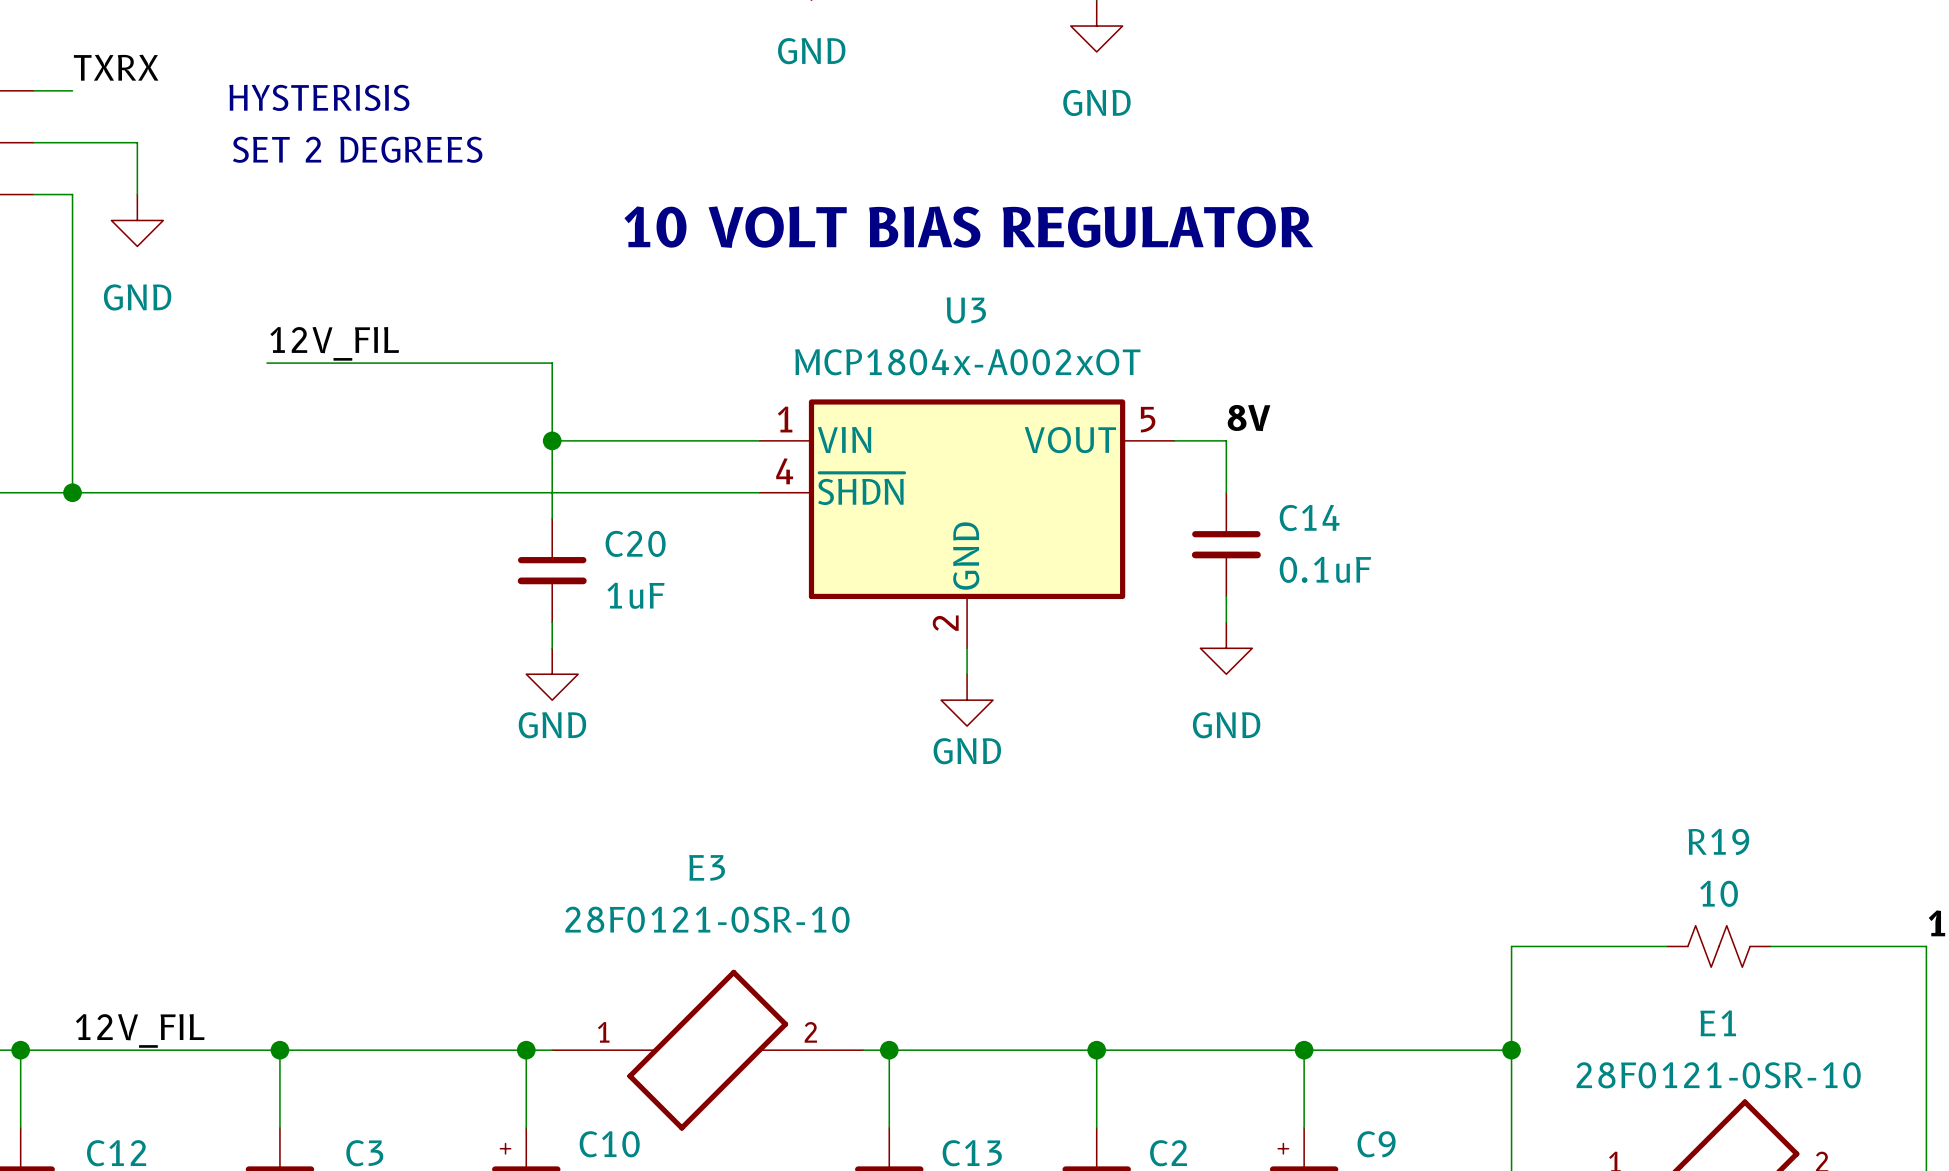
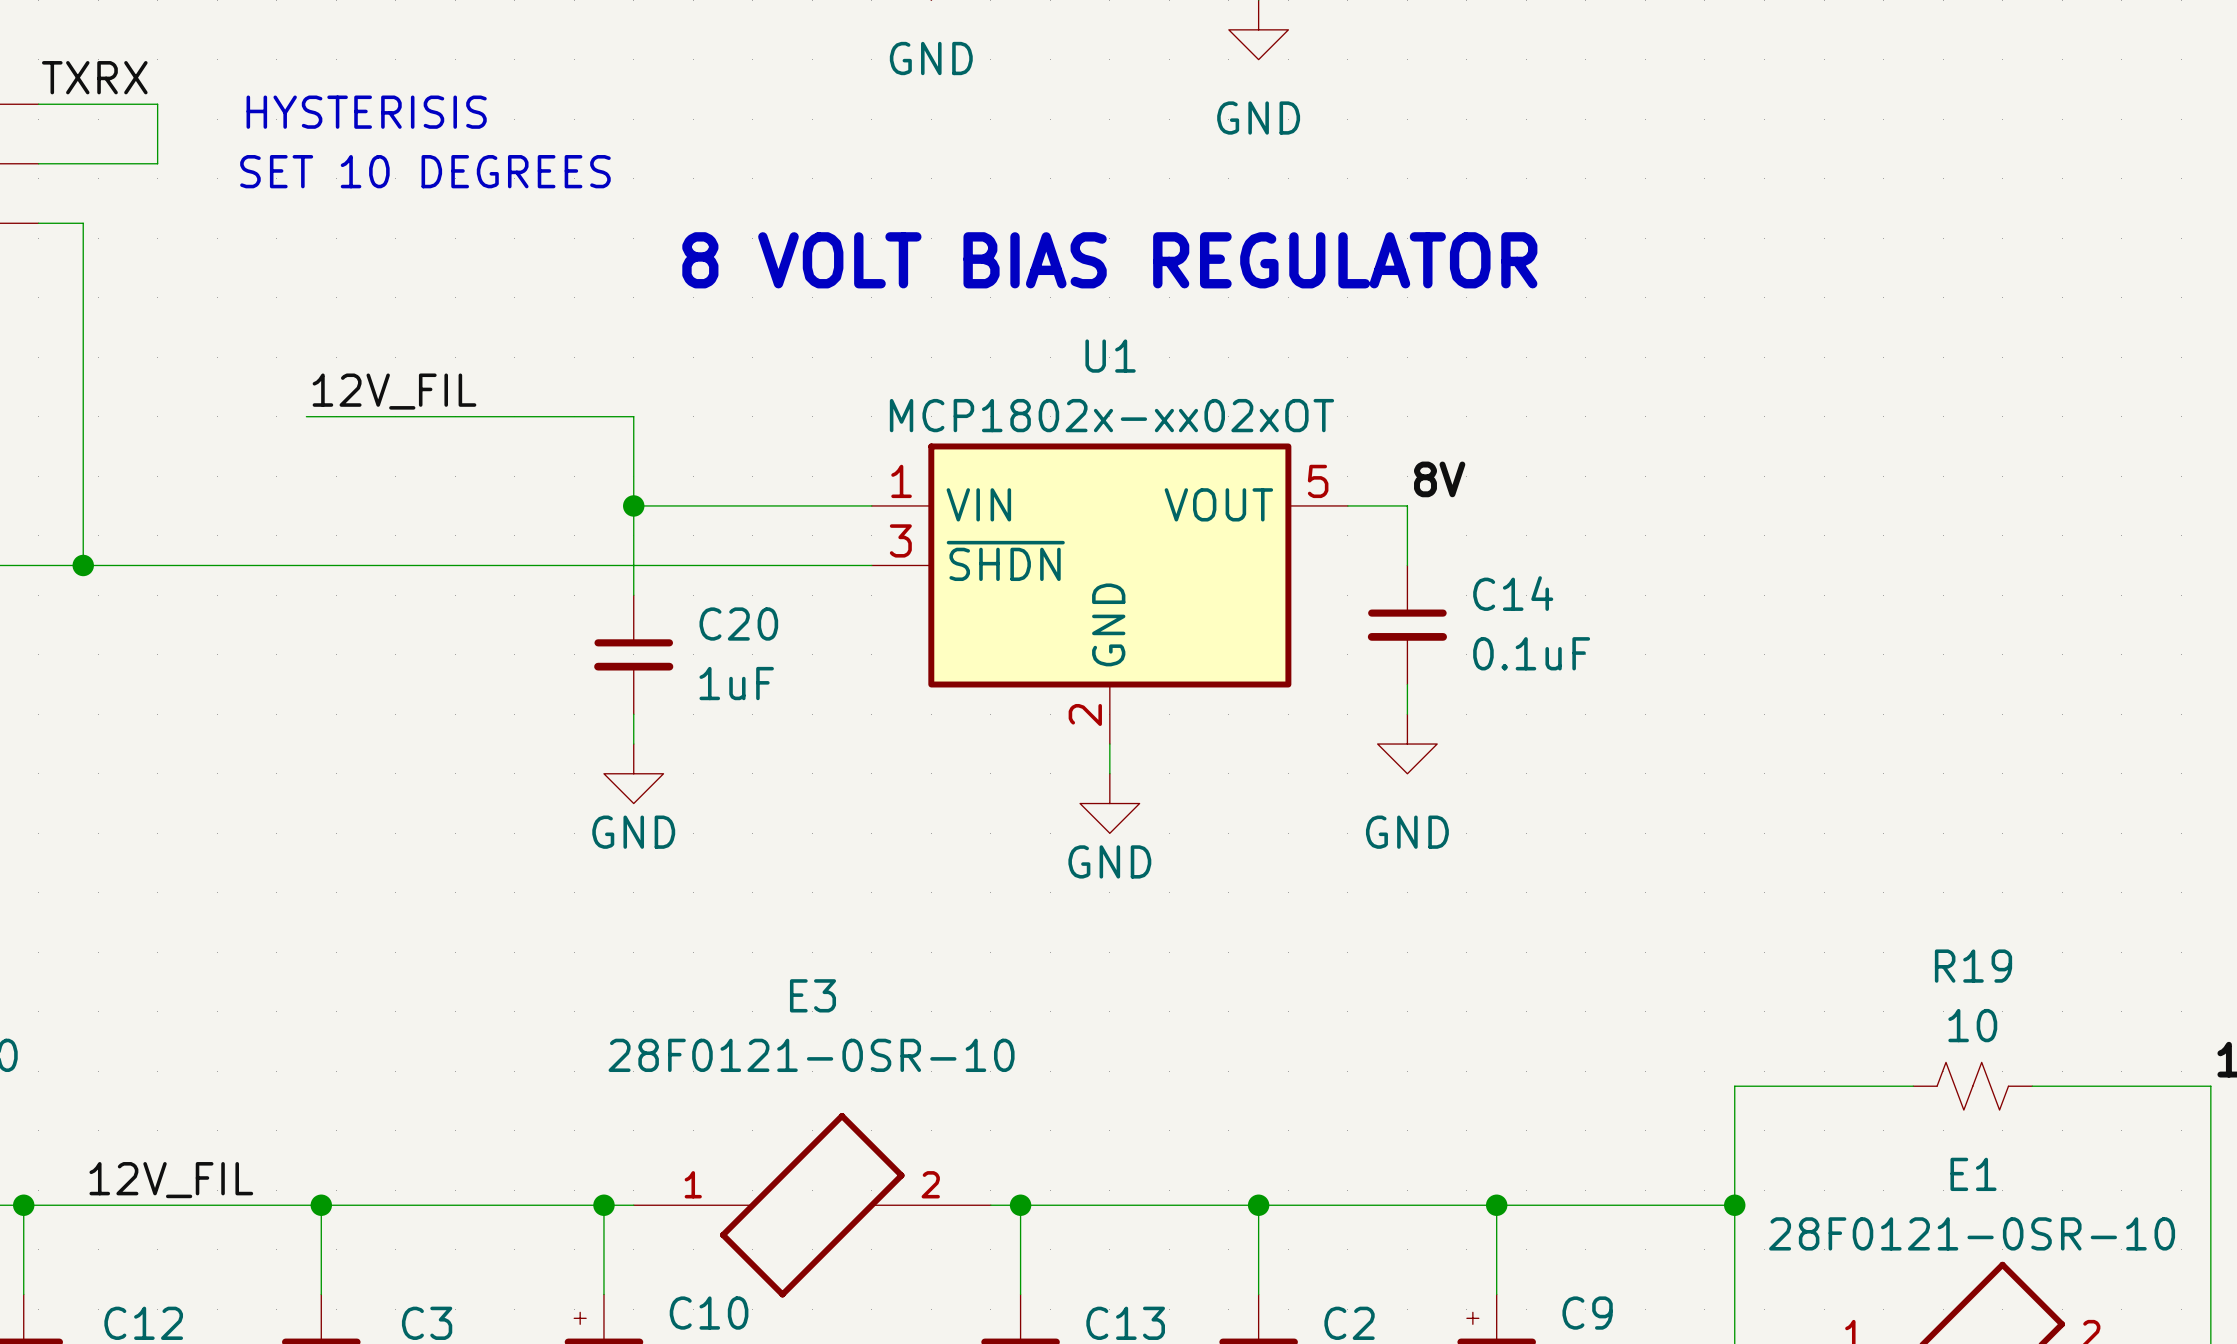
label position: TXRX (116, 67) -> TXRX (94, 77)
wire: (137, 142) (137, 194) -> (157, 163) (157, 104) (83, 104)
text: SET 2 DEGREES (357, 149) -> SET 10 DEGREES (425, 171)
power symbol: GND (137, 220) -> none
text: 10 VOLT BIAS REGULATOR (968, 227) -> 8 VOLT BIAS REGULATOR (1109, 260)
U1: none -> MCP1802x-xx02xOT (1109, 593)
U3: MCP1804x-A002xOT (967, 523) -> none

